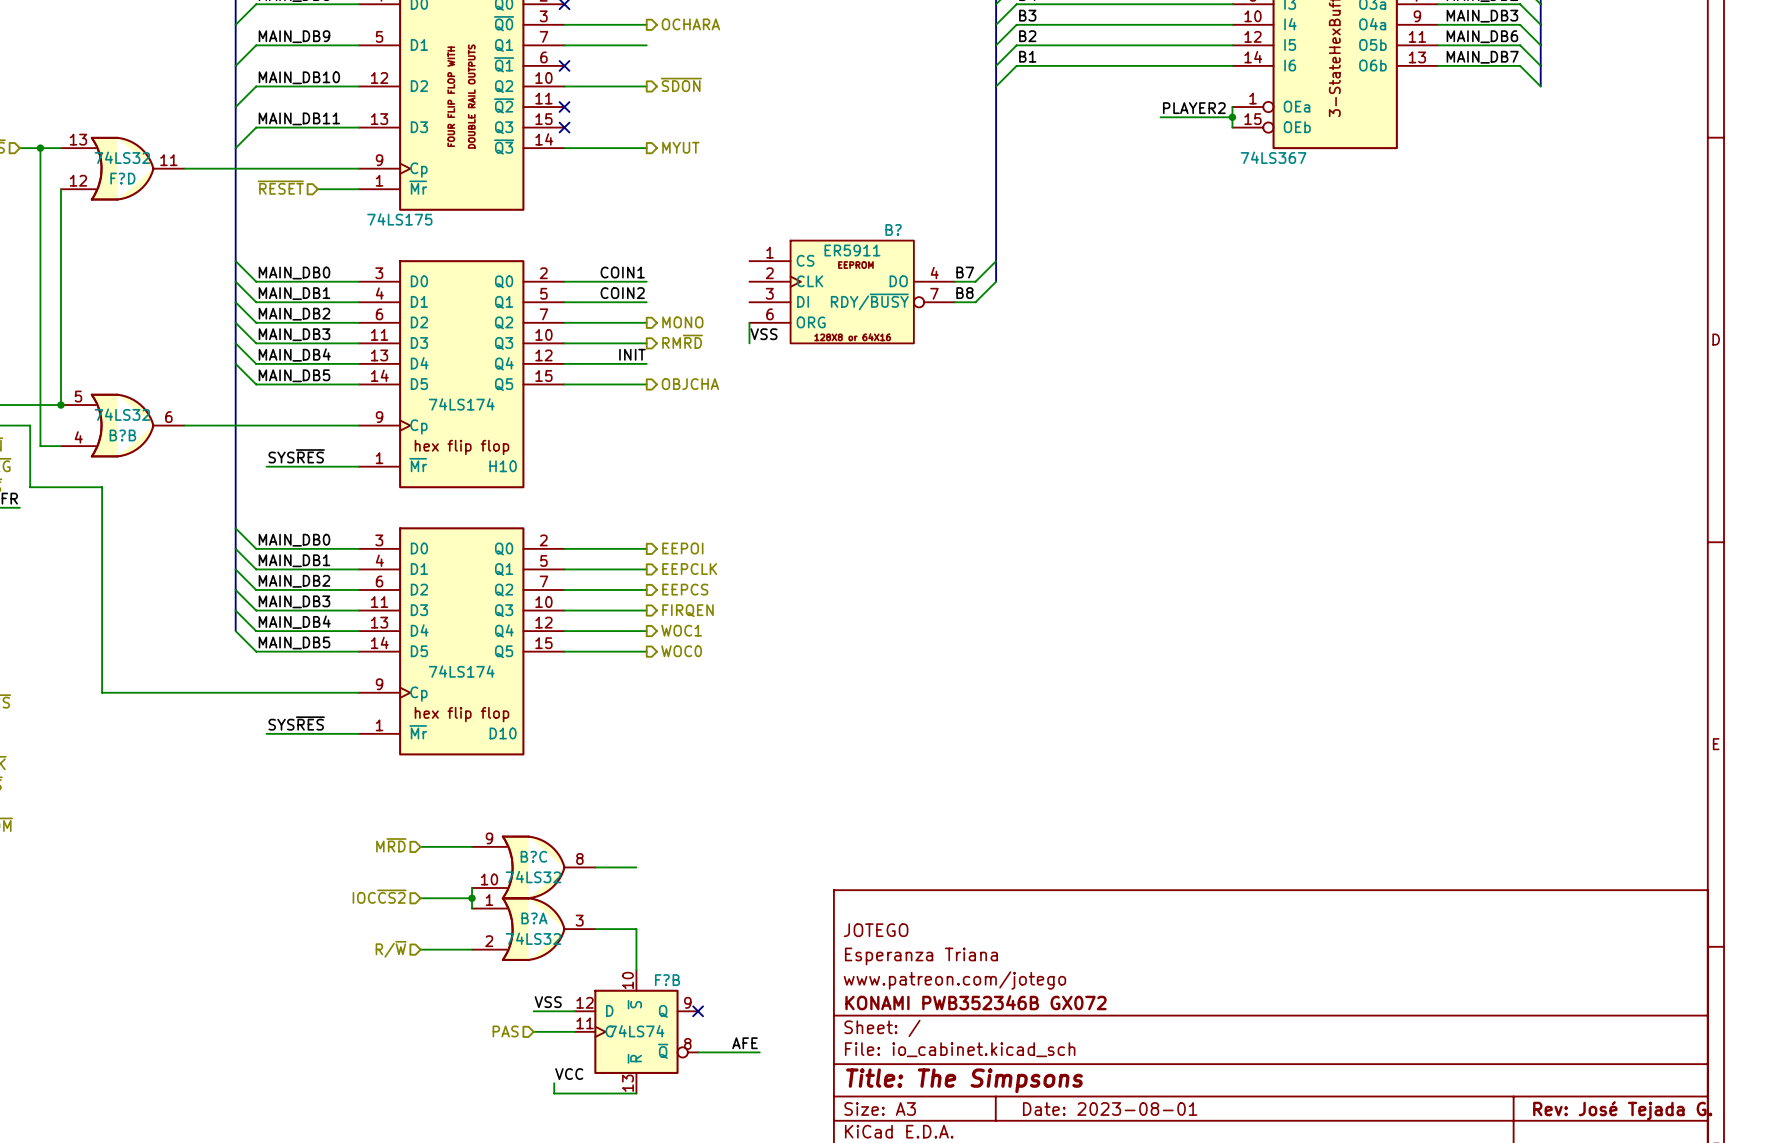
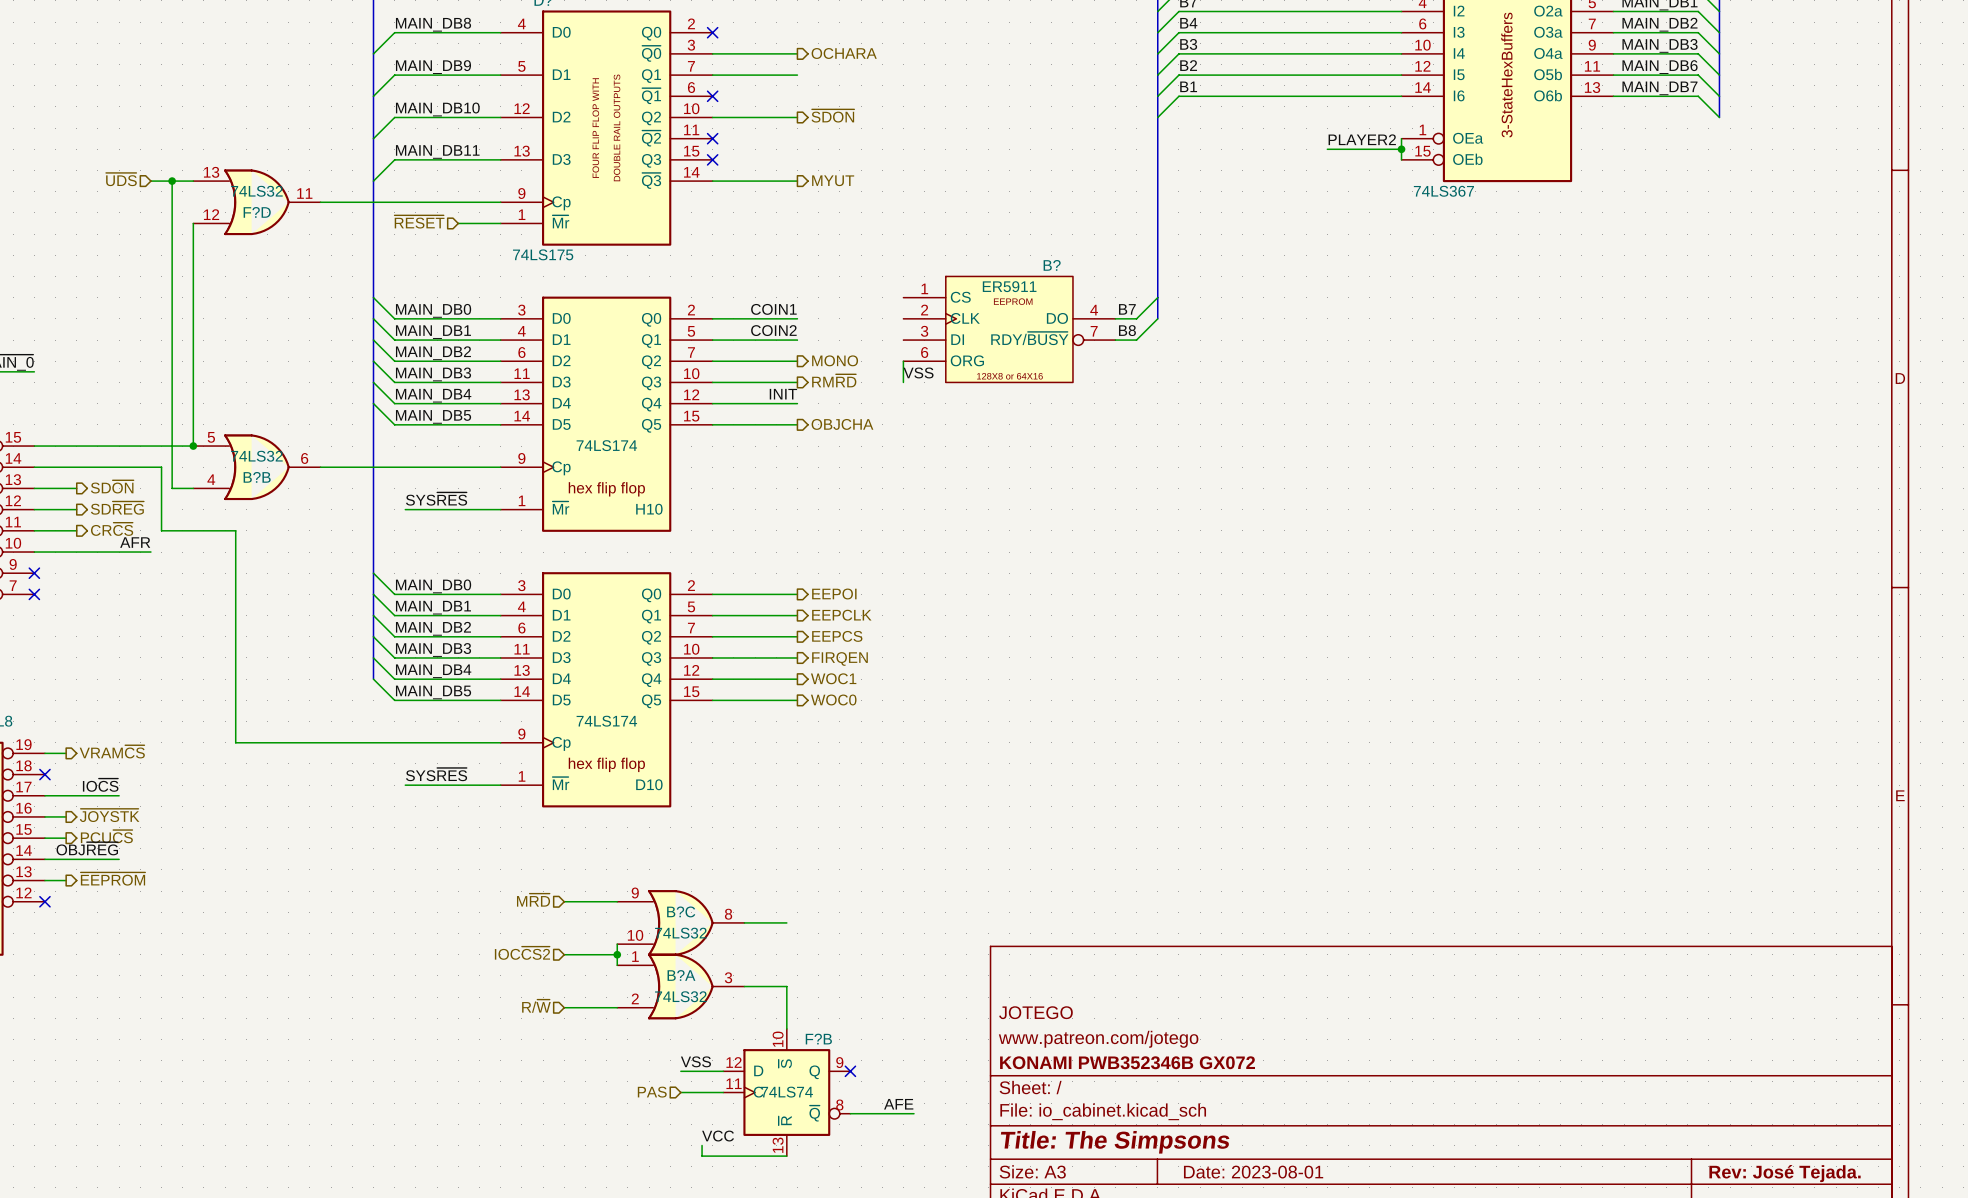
title block: JOTEGO (876, 930) -> none
title block: Esperanza Triana (921, 956) -> JOTEGO (1035, 1012)
title block: Rev: José Tejada G. (1622, 1110) -> Rev: José Tejada. (1785, 1173)

